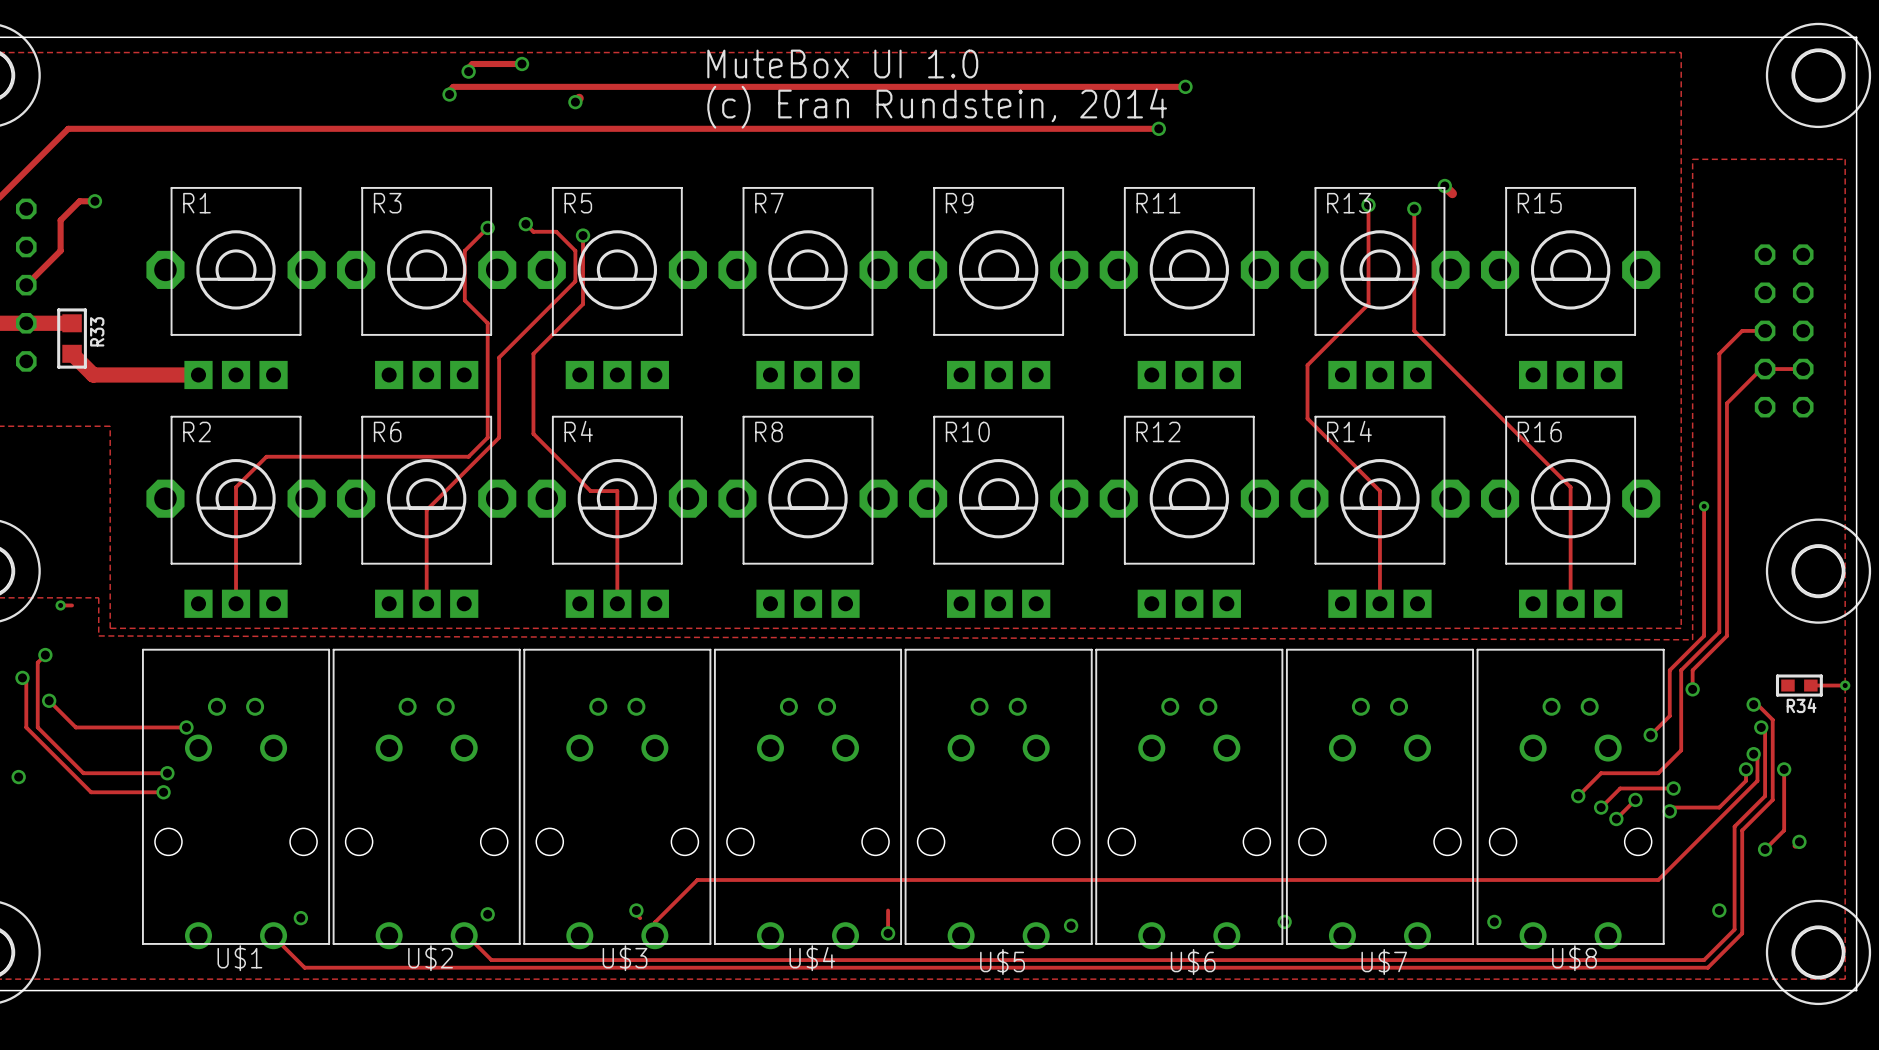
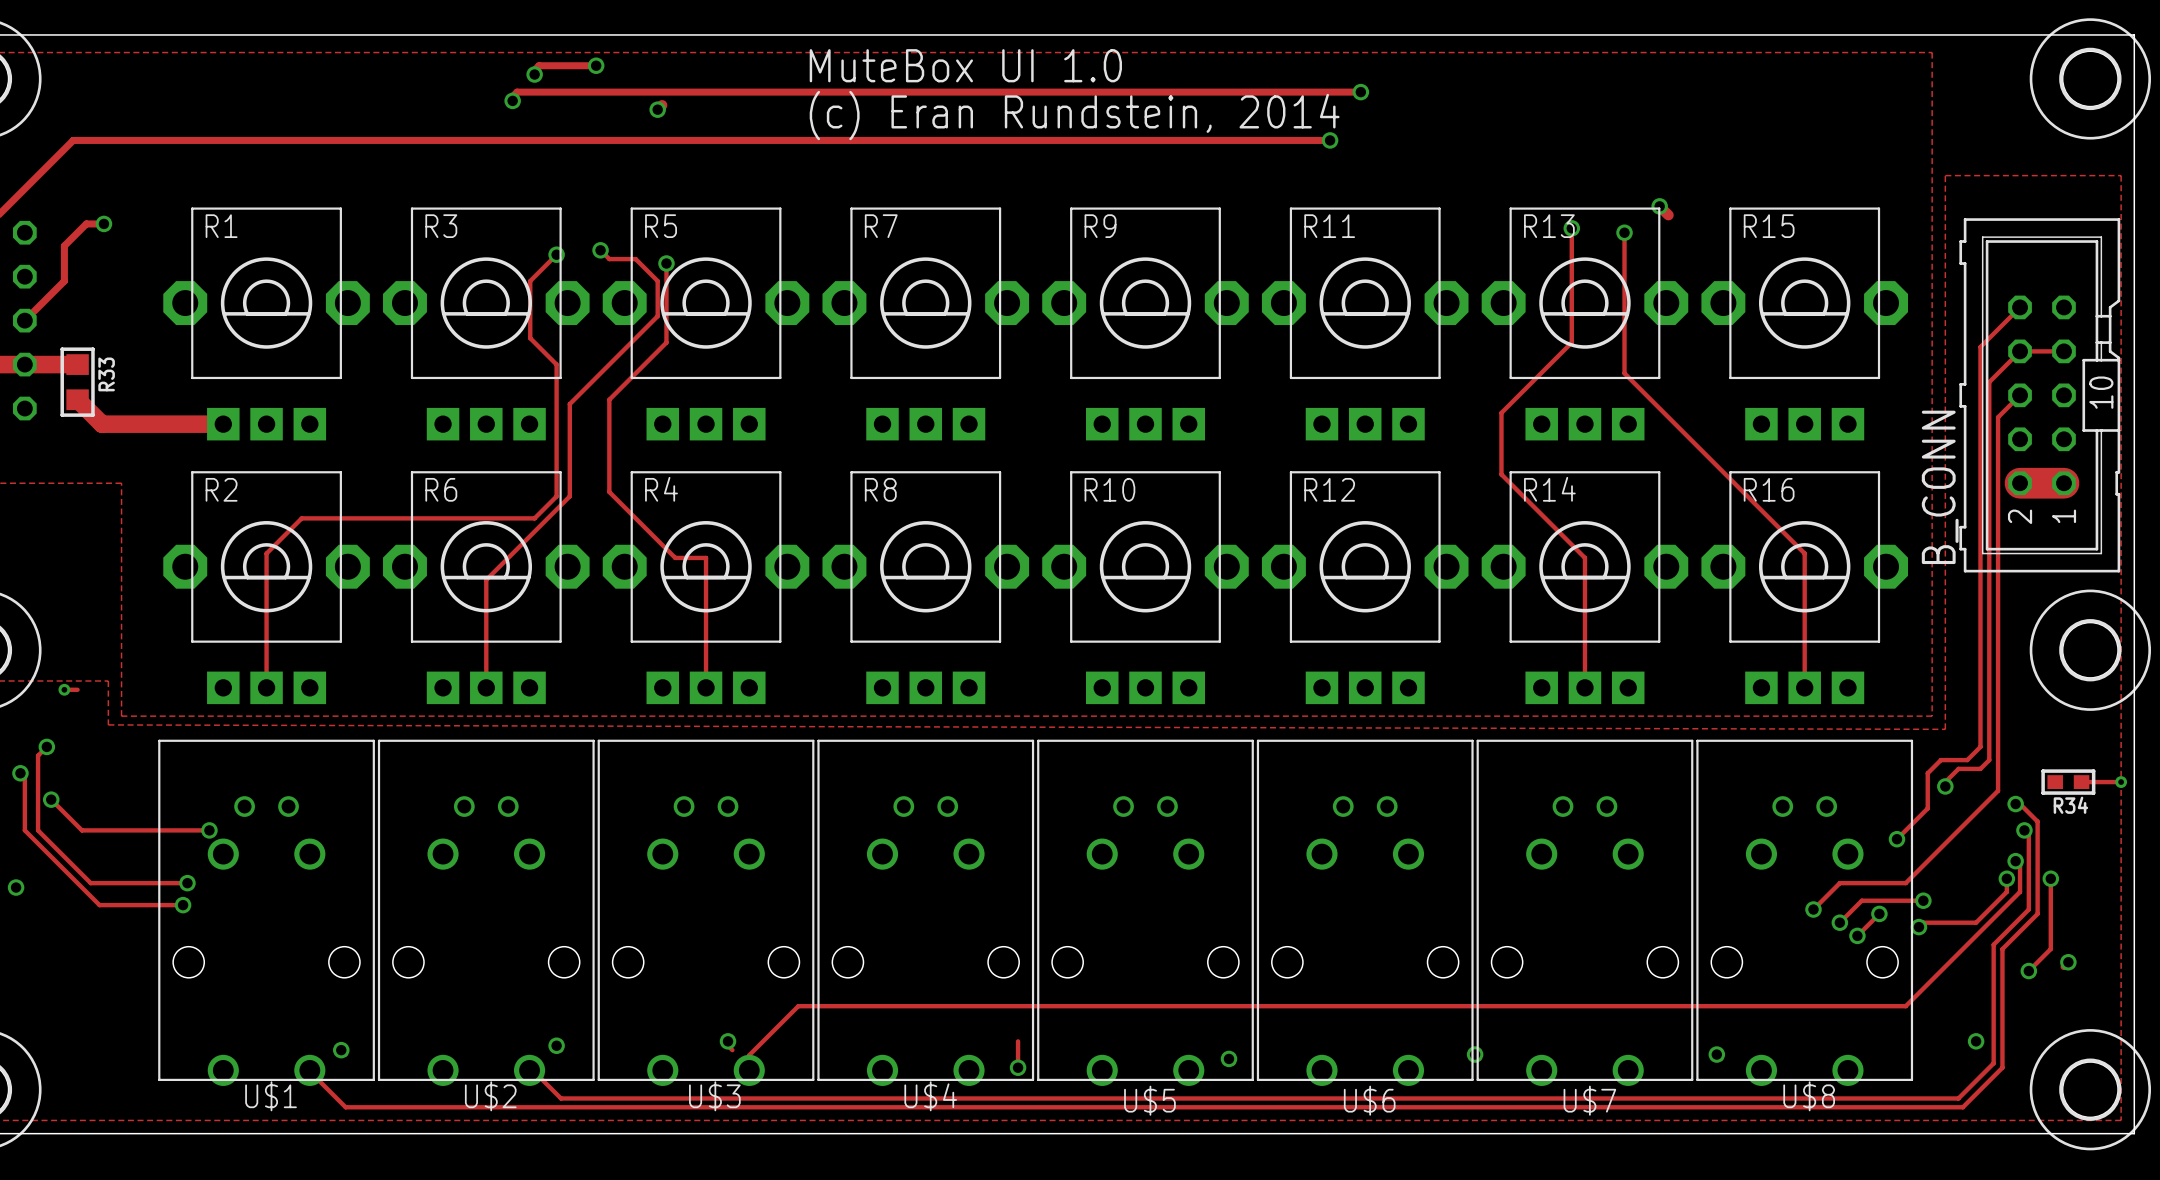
track: none -> (2063, 351) (2020, 351) (1989, 382) (1989, 760) (1980, 768) (1958, 768) (1945, 782)
track: (1765, 330) (1742, 330) (1719, 353) (1719, 632) (1681, 670) (1681, 750) -> (2020, 395) (1998, 417) (1998, 790) (1932, 856)
B_CONN side: bottom (1784, 330) -> top (2039, 395)
track: (1803, 369) (1761, 369) (1726, 403) (1726, 635) (1692, 670) (1692, 689) -> none
track: none -> (2020, 483) (2063, 483)
track: (1704, 506) (1704, 635) (1669, 670) (1669, 716) -> (2020, 307) (1980, 347) (1980, 746) (1967, 760) (1940, 760) (1927, 773) (1927, 808) (1918, 817)
via: (1704, 506) -> none

